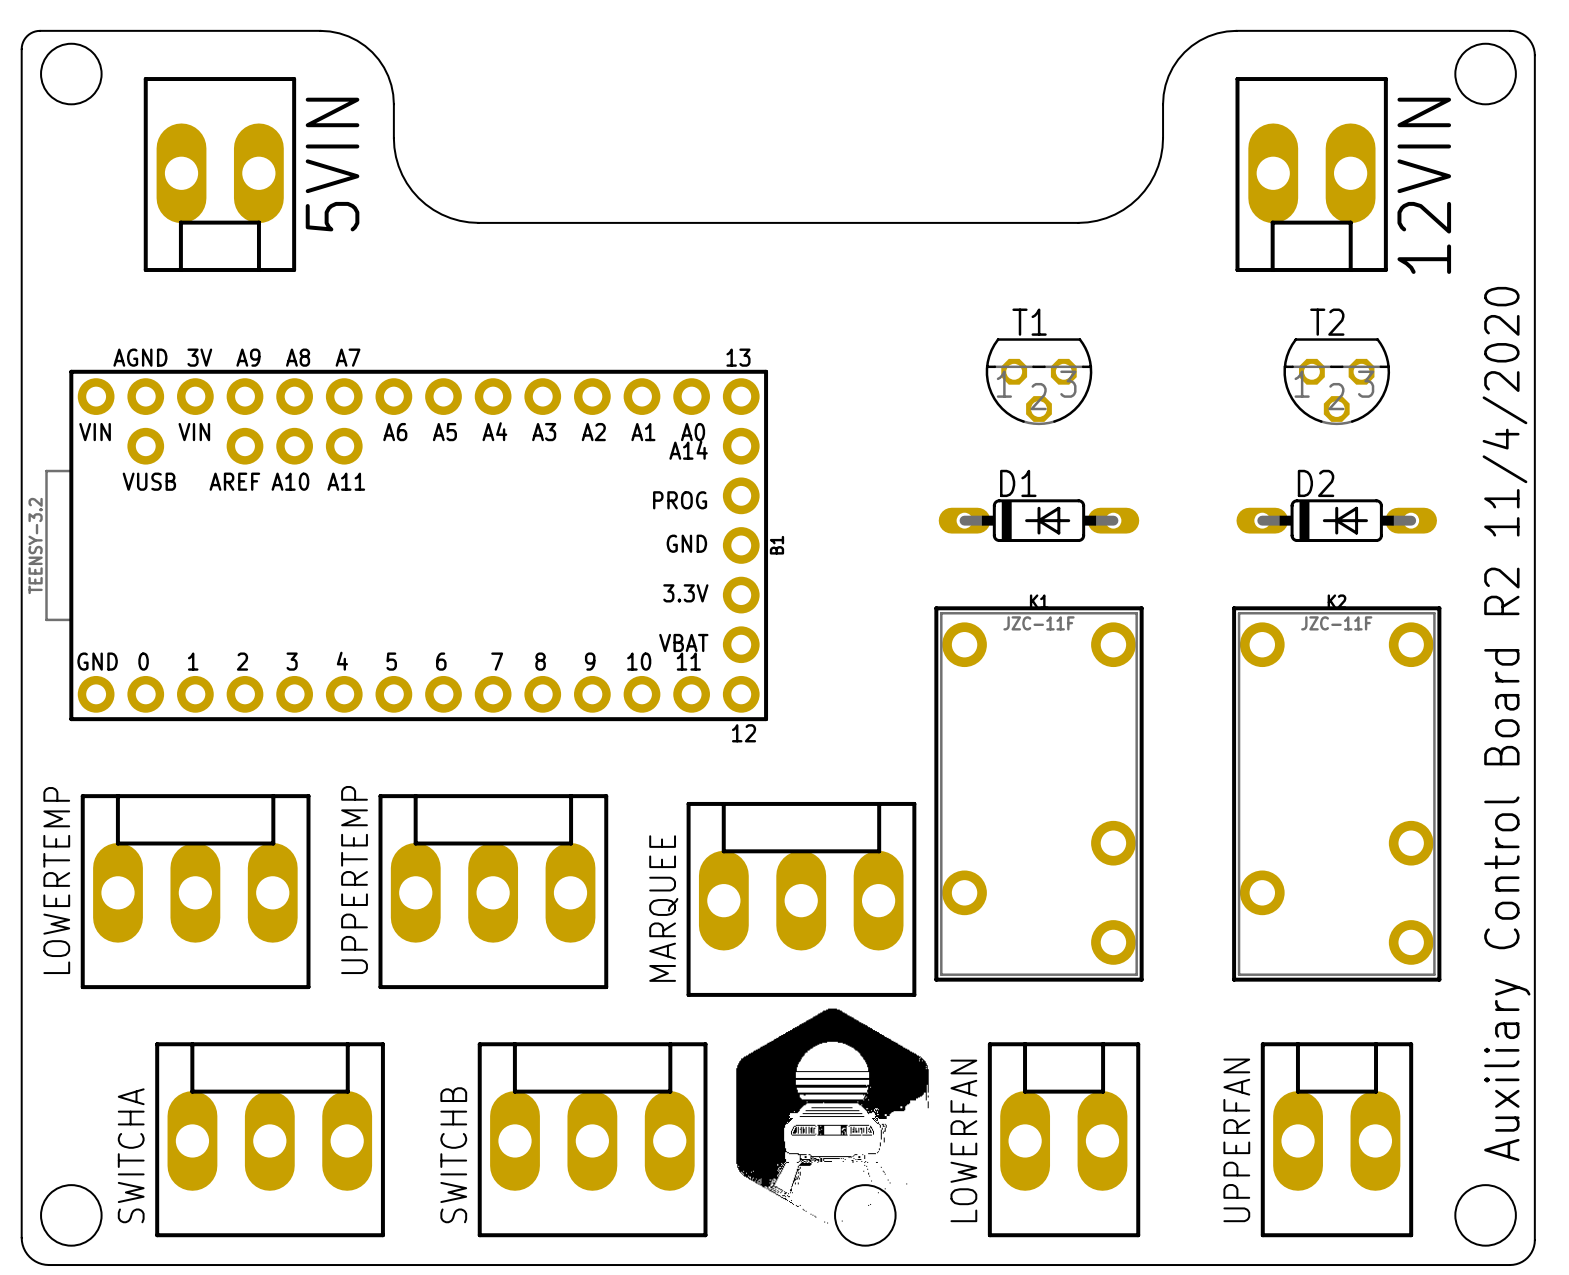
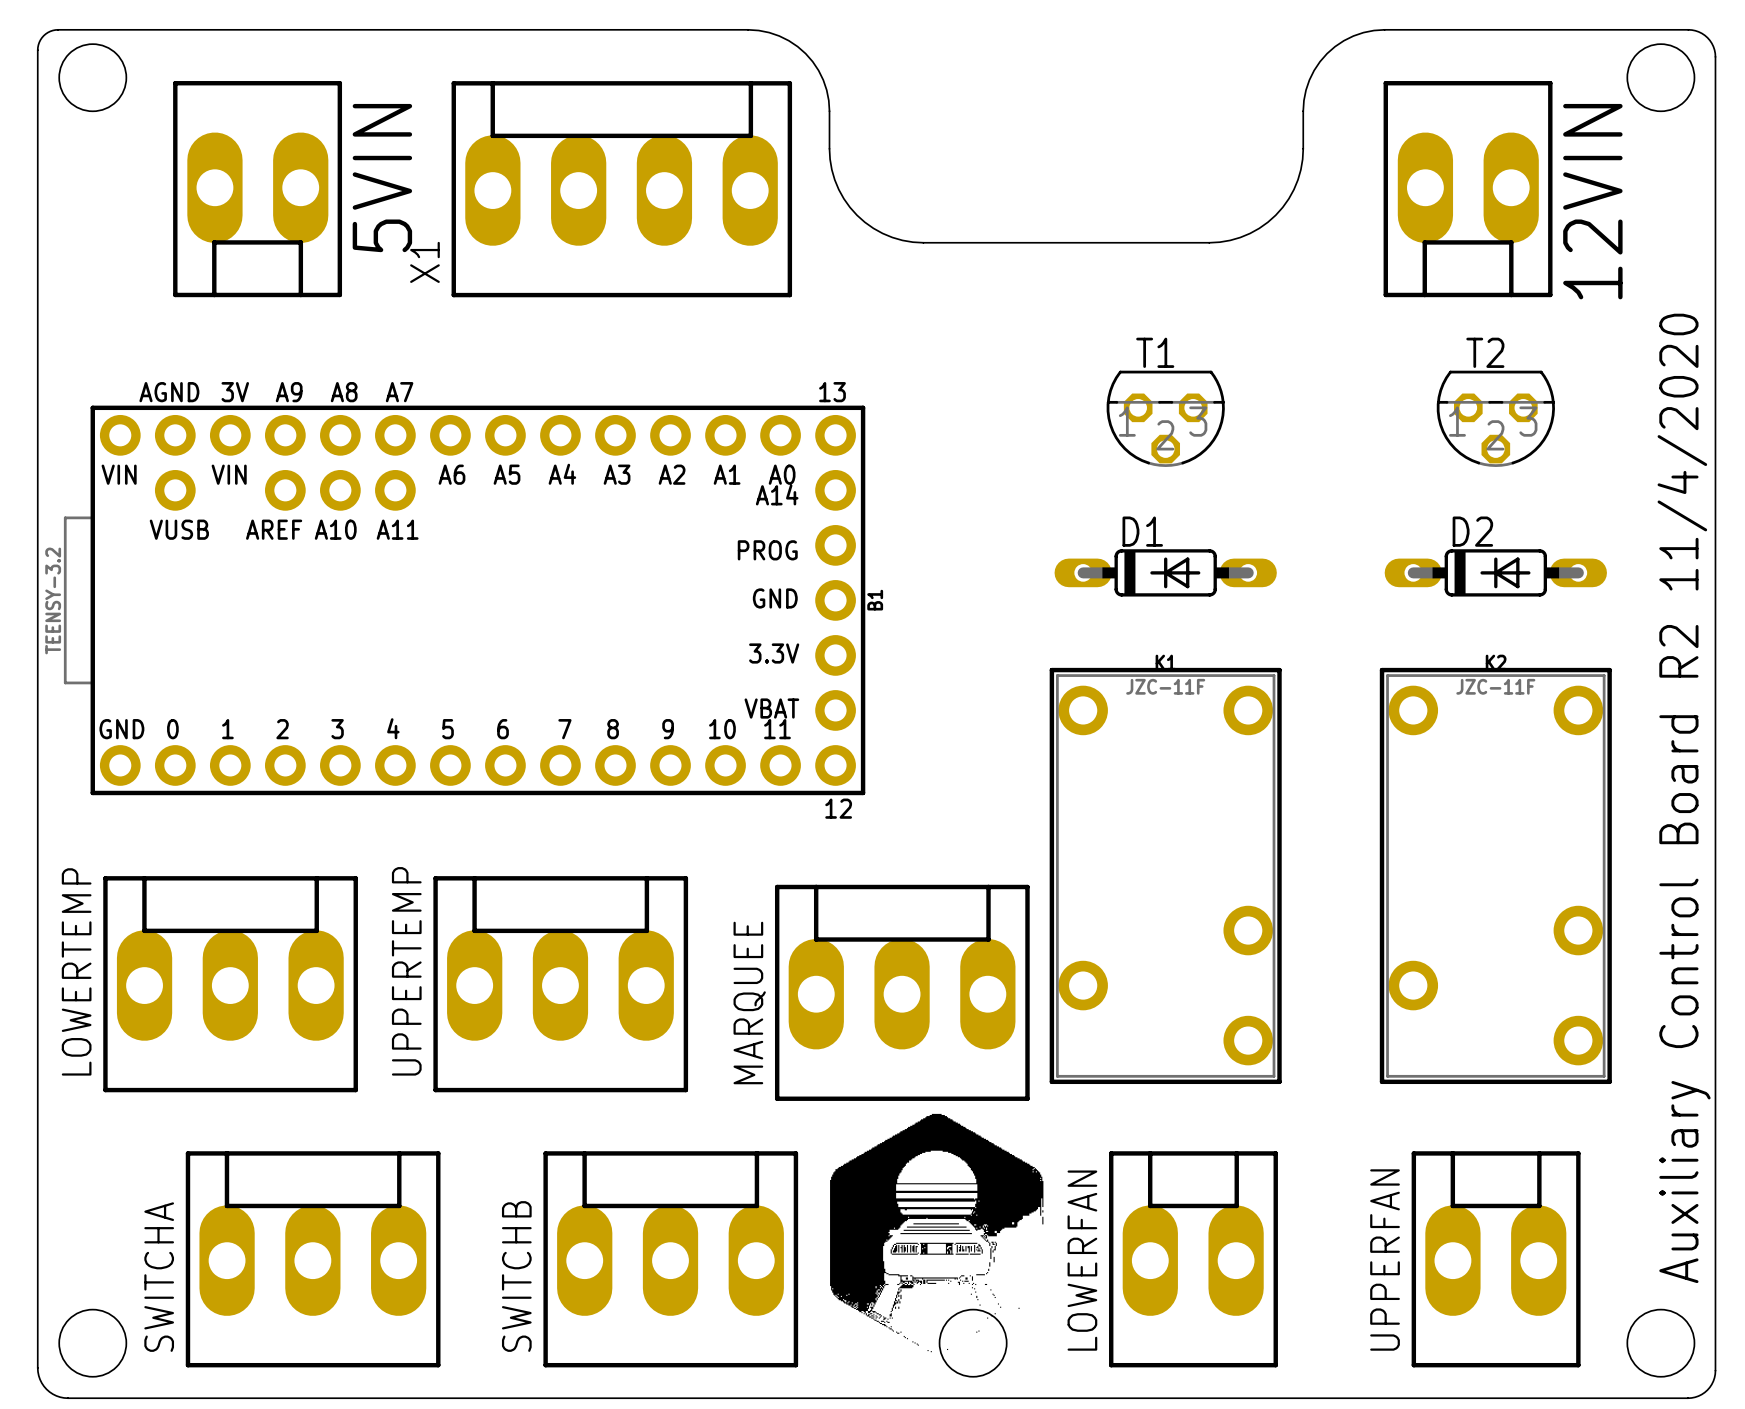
board edge: (320, 30) (348, 36) (365, 46) (378, 59) (391, 85) (393, 104) (394, 147) (402, 174) (418, 198) (433, 209) (450, 218) (478, 222) (820, 222) -> (369, 29) (748, 29) (779, 36) (805, 53) (823, 80) (828, 100) (831, 169) (843, 198) (857, 215) (873, 228) (892, 237) (923, 242)
X1: none -> (621, 189)

